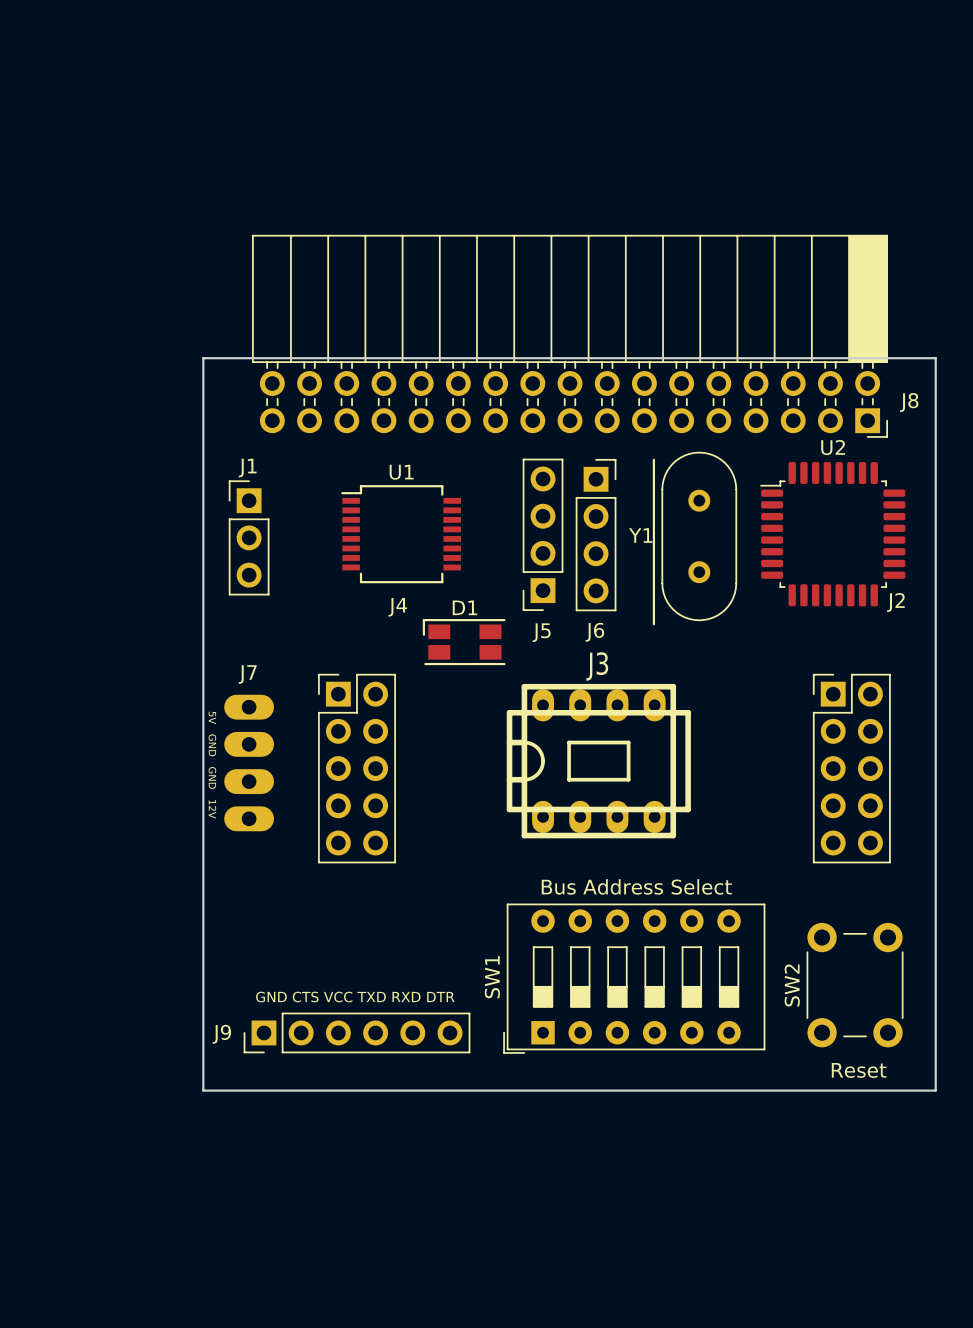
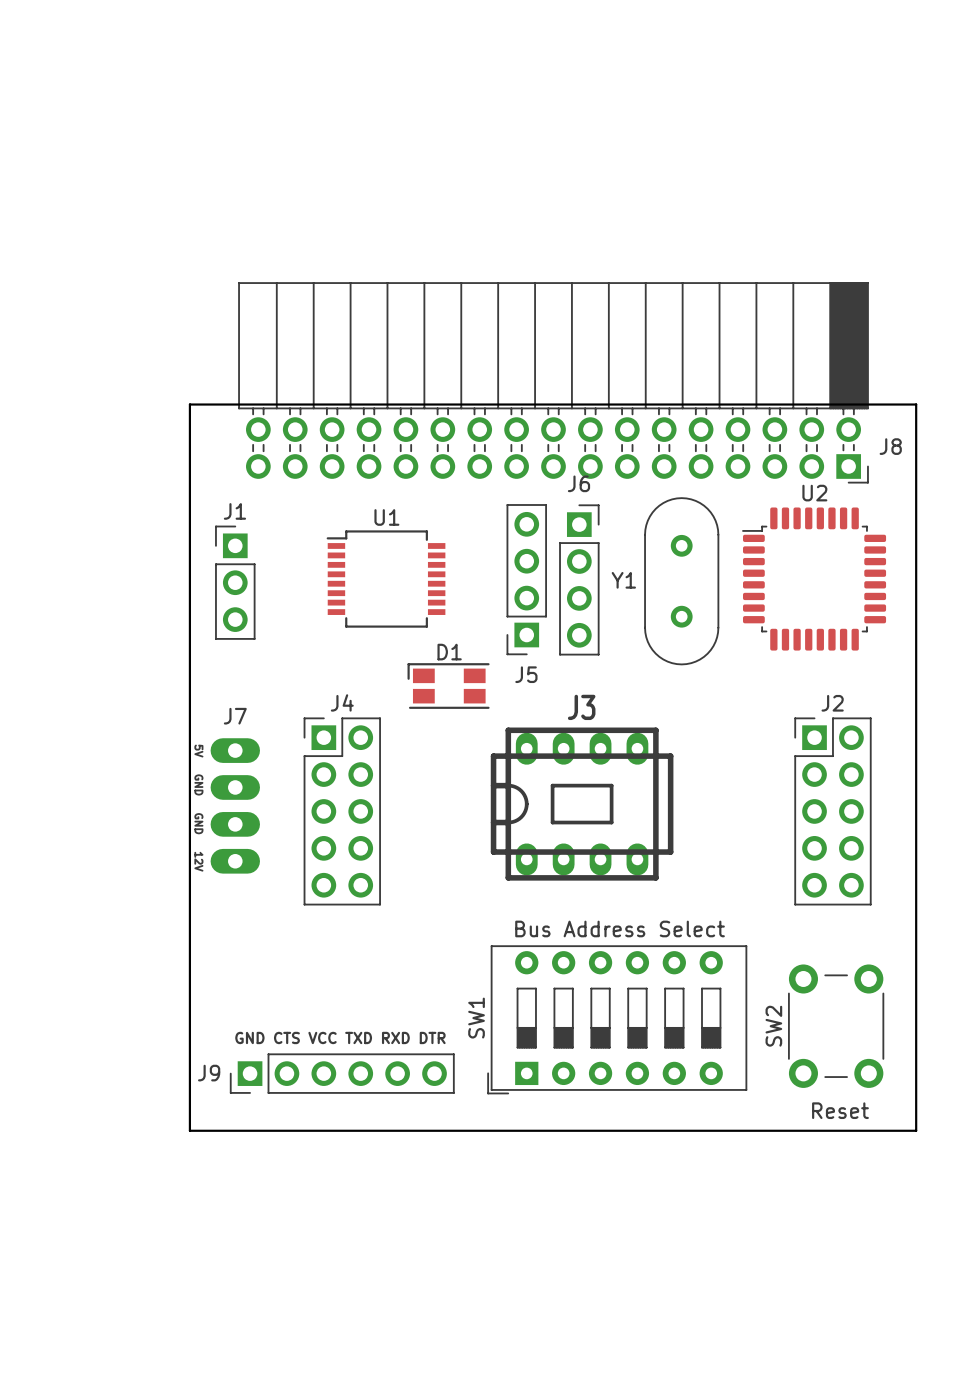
line: (653, 459) (653, 624) -> none
J2 name position: J2 (895, 602) -> J2 (832, 703)
J4 name position: J4 (397, 607) -> J4 (342, 702)
J6 name position: J6 (594, 632) -> J6 (578, 483)

